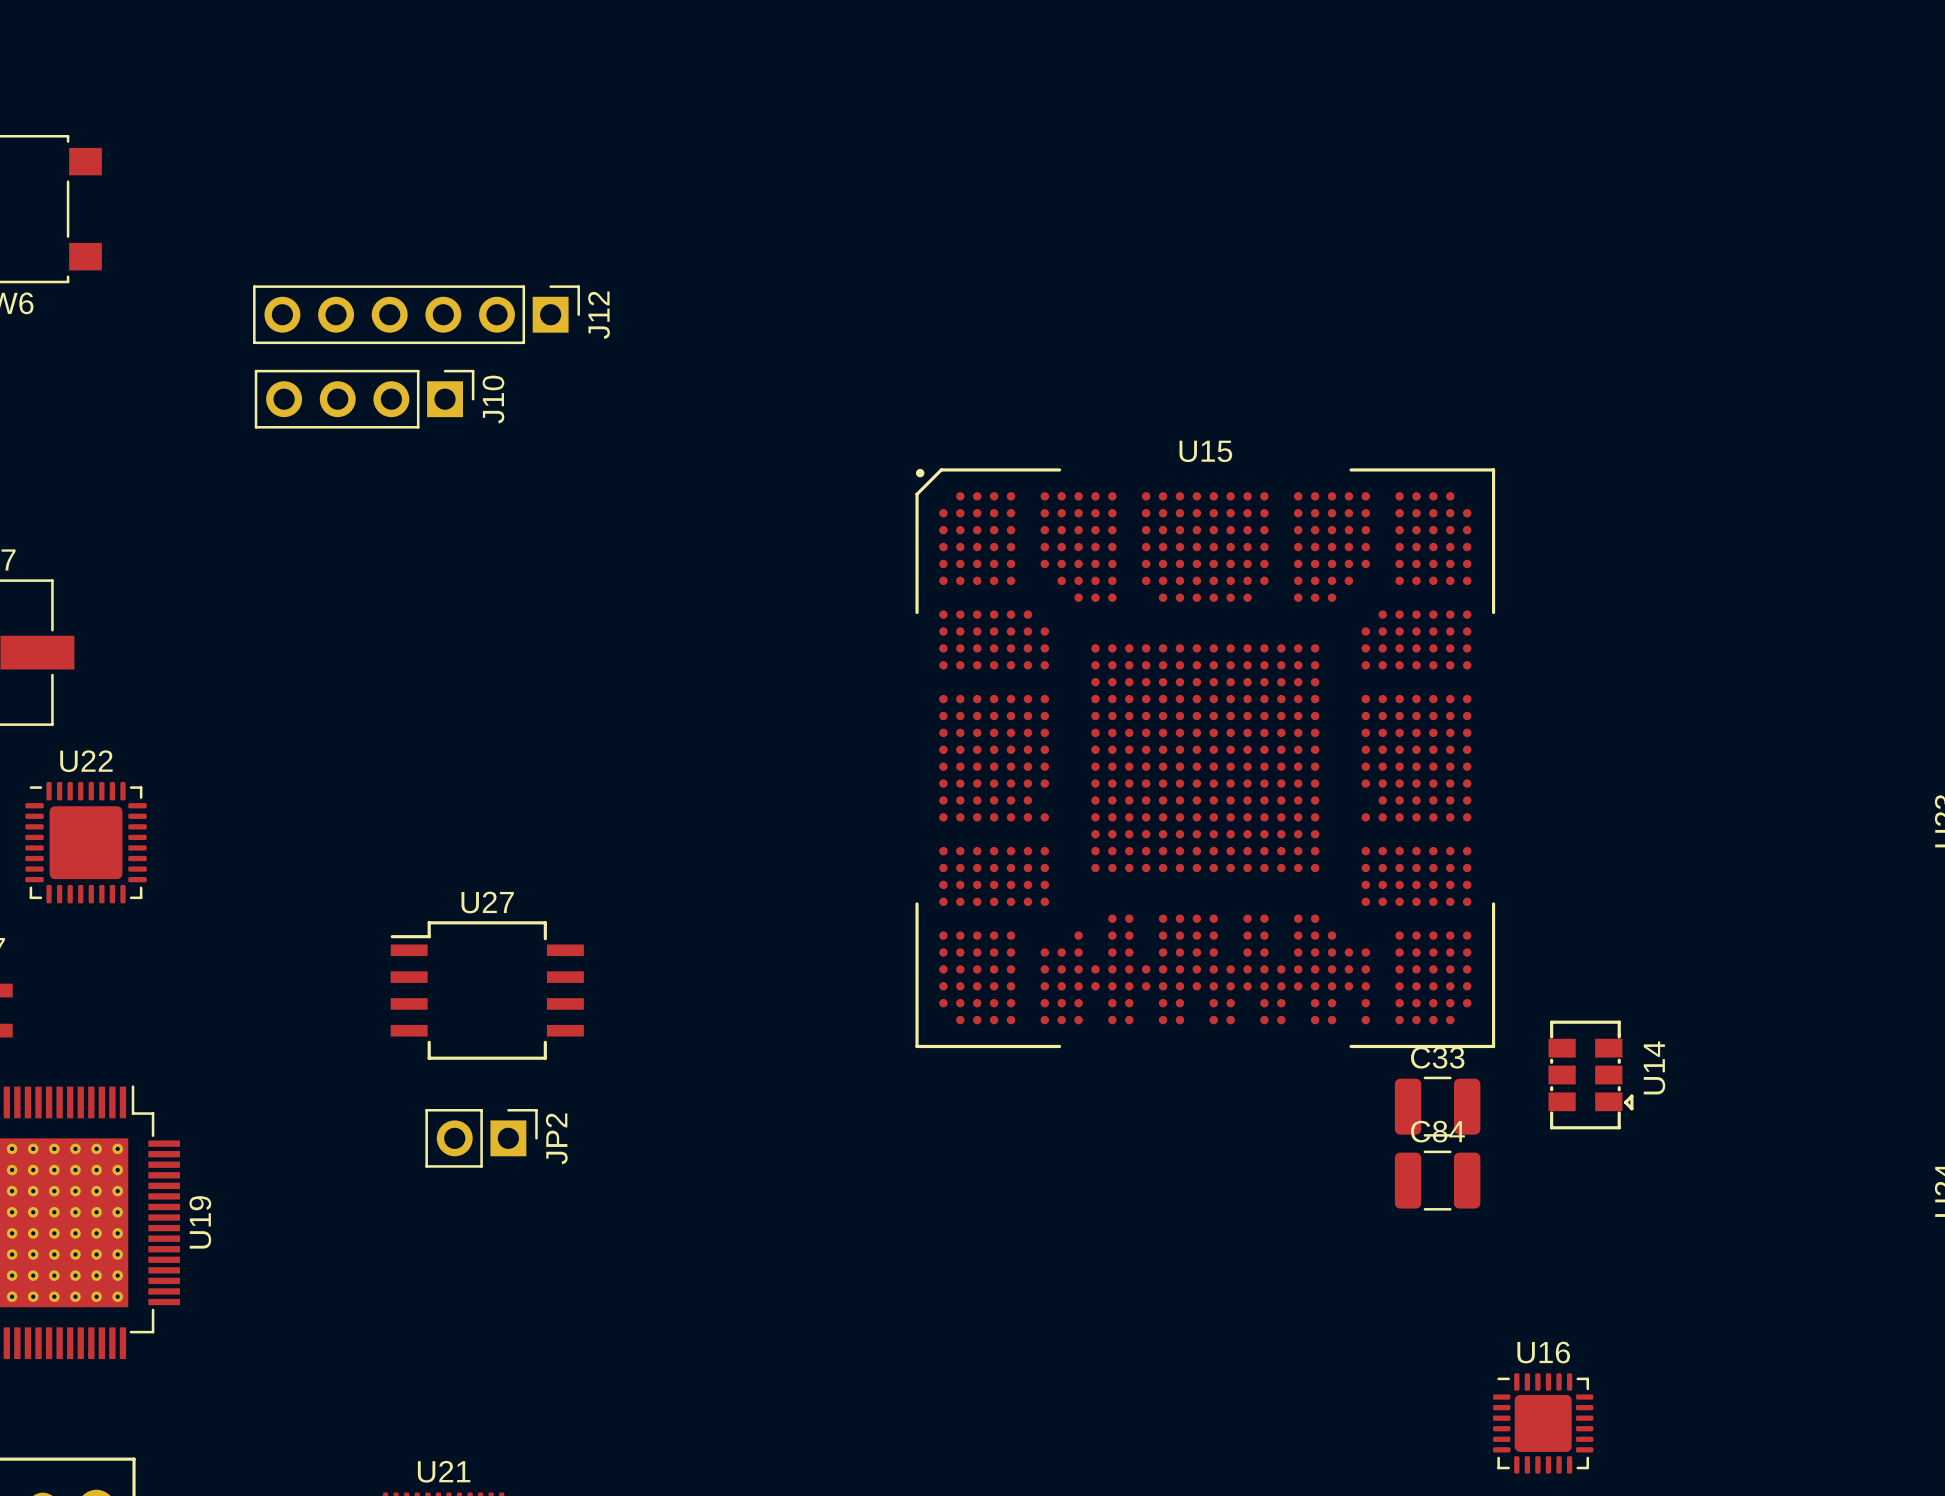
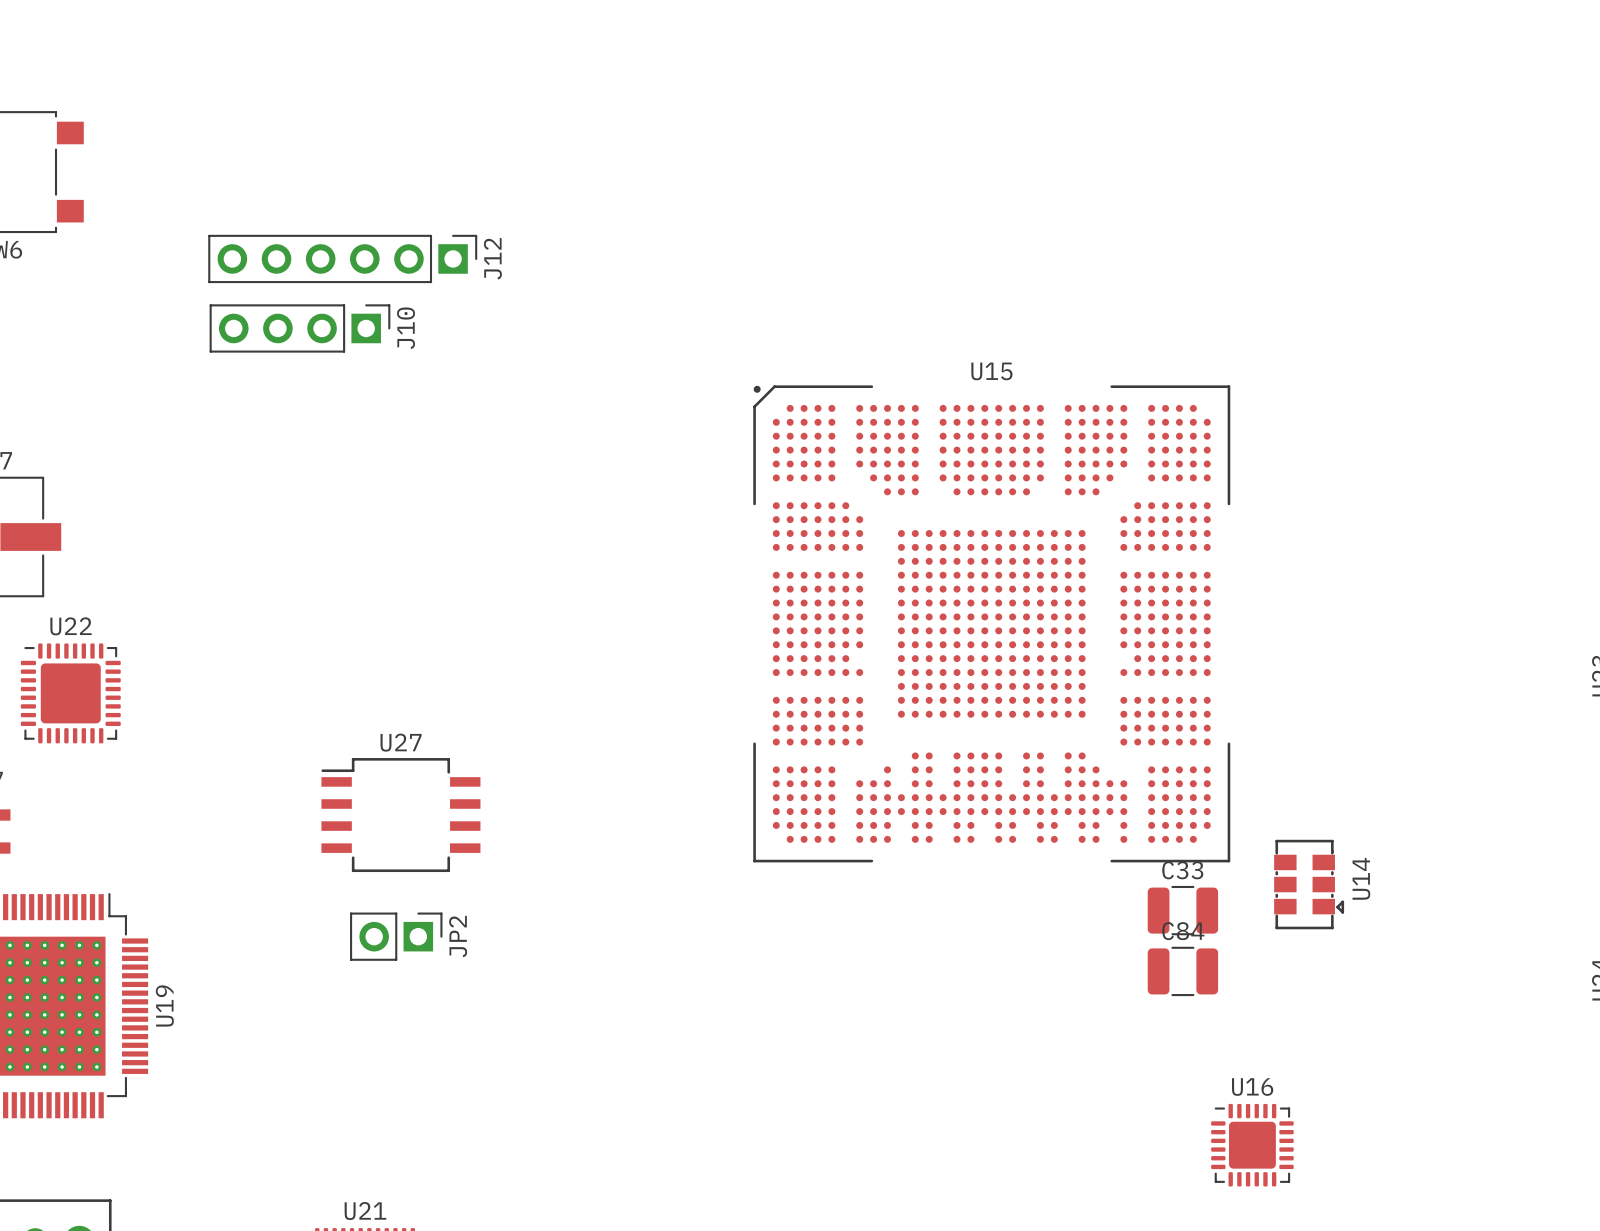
U16 position: (1543, 1423) -> (1252, 1145)

